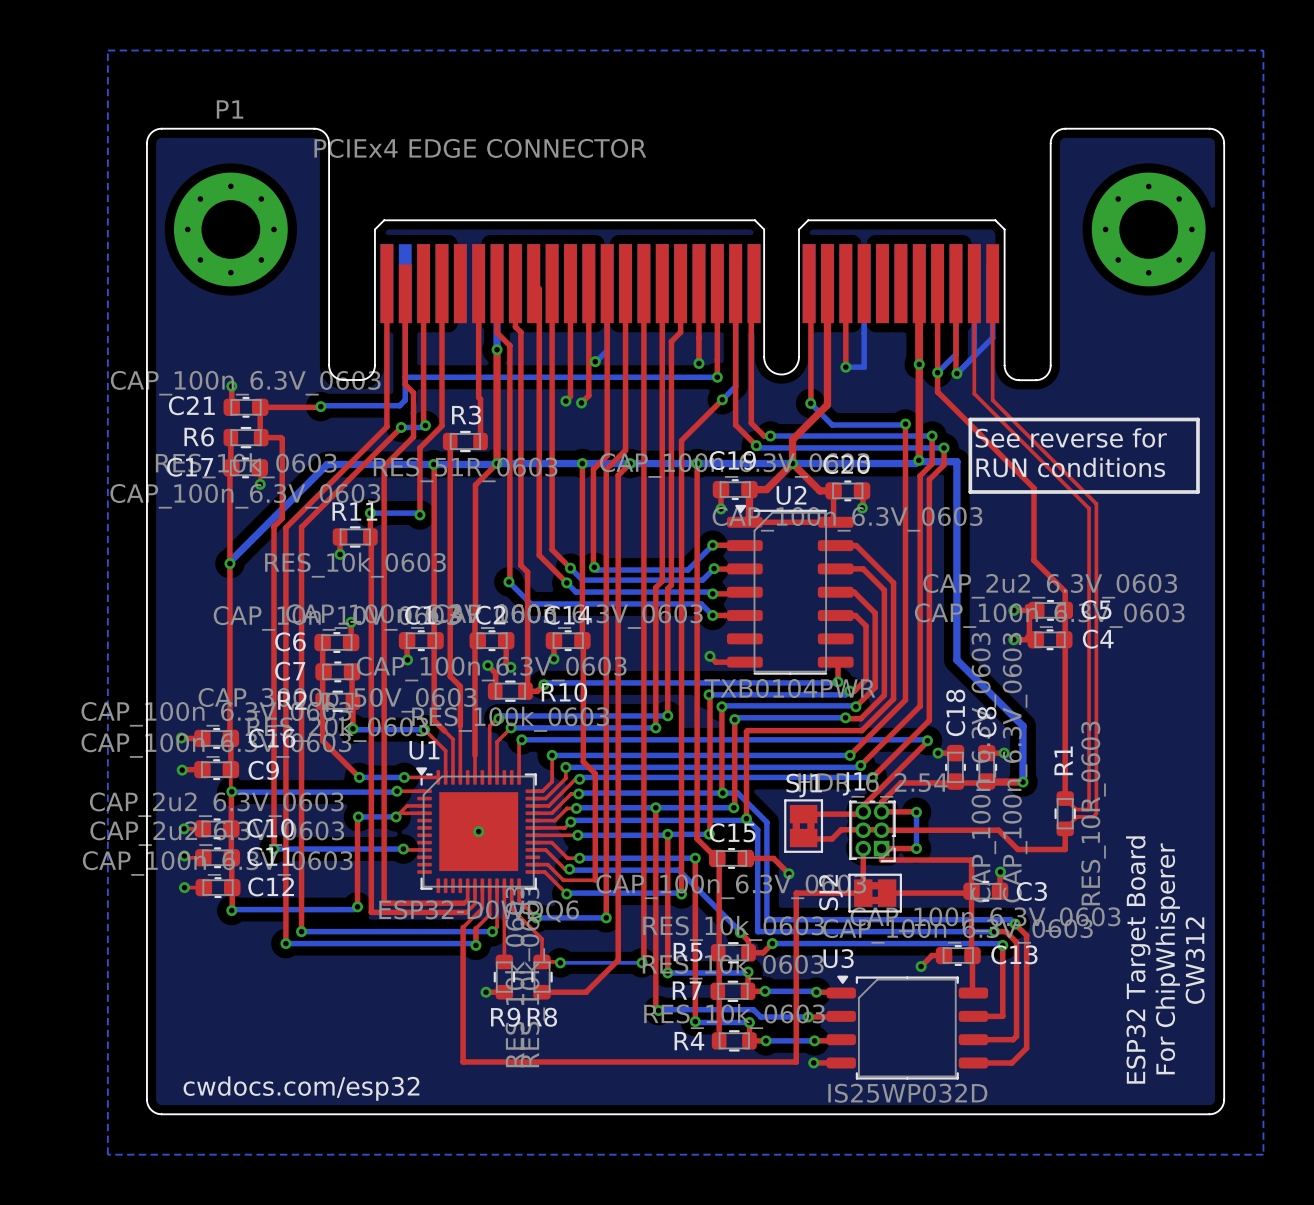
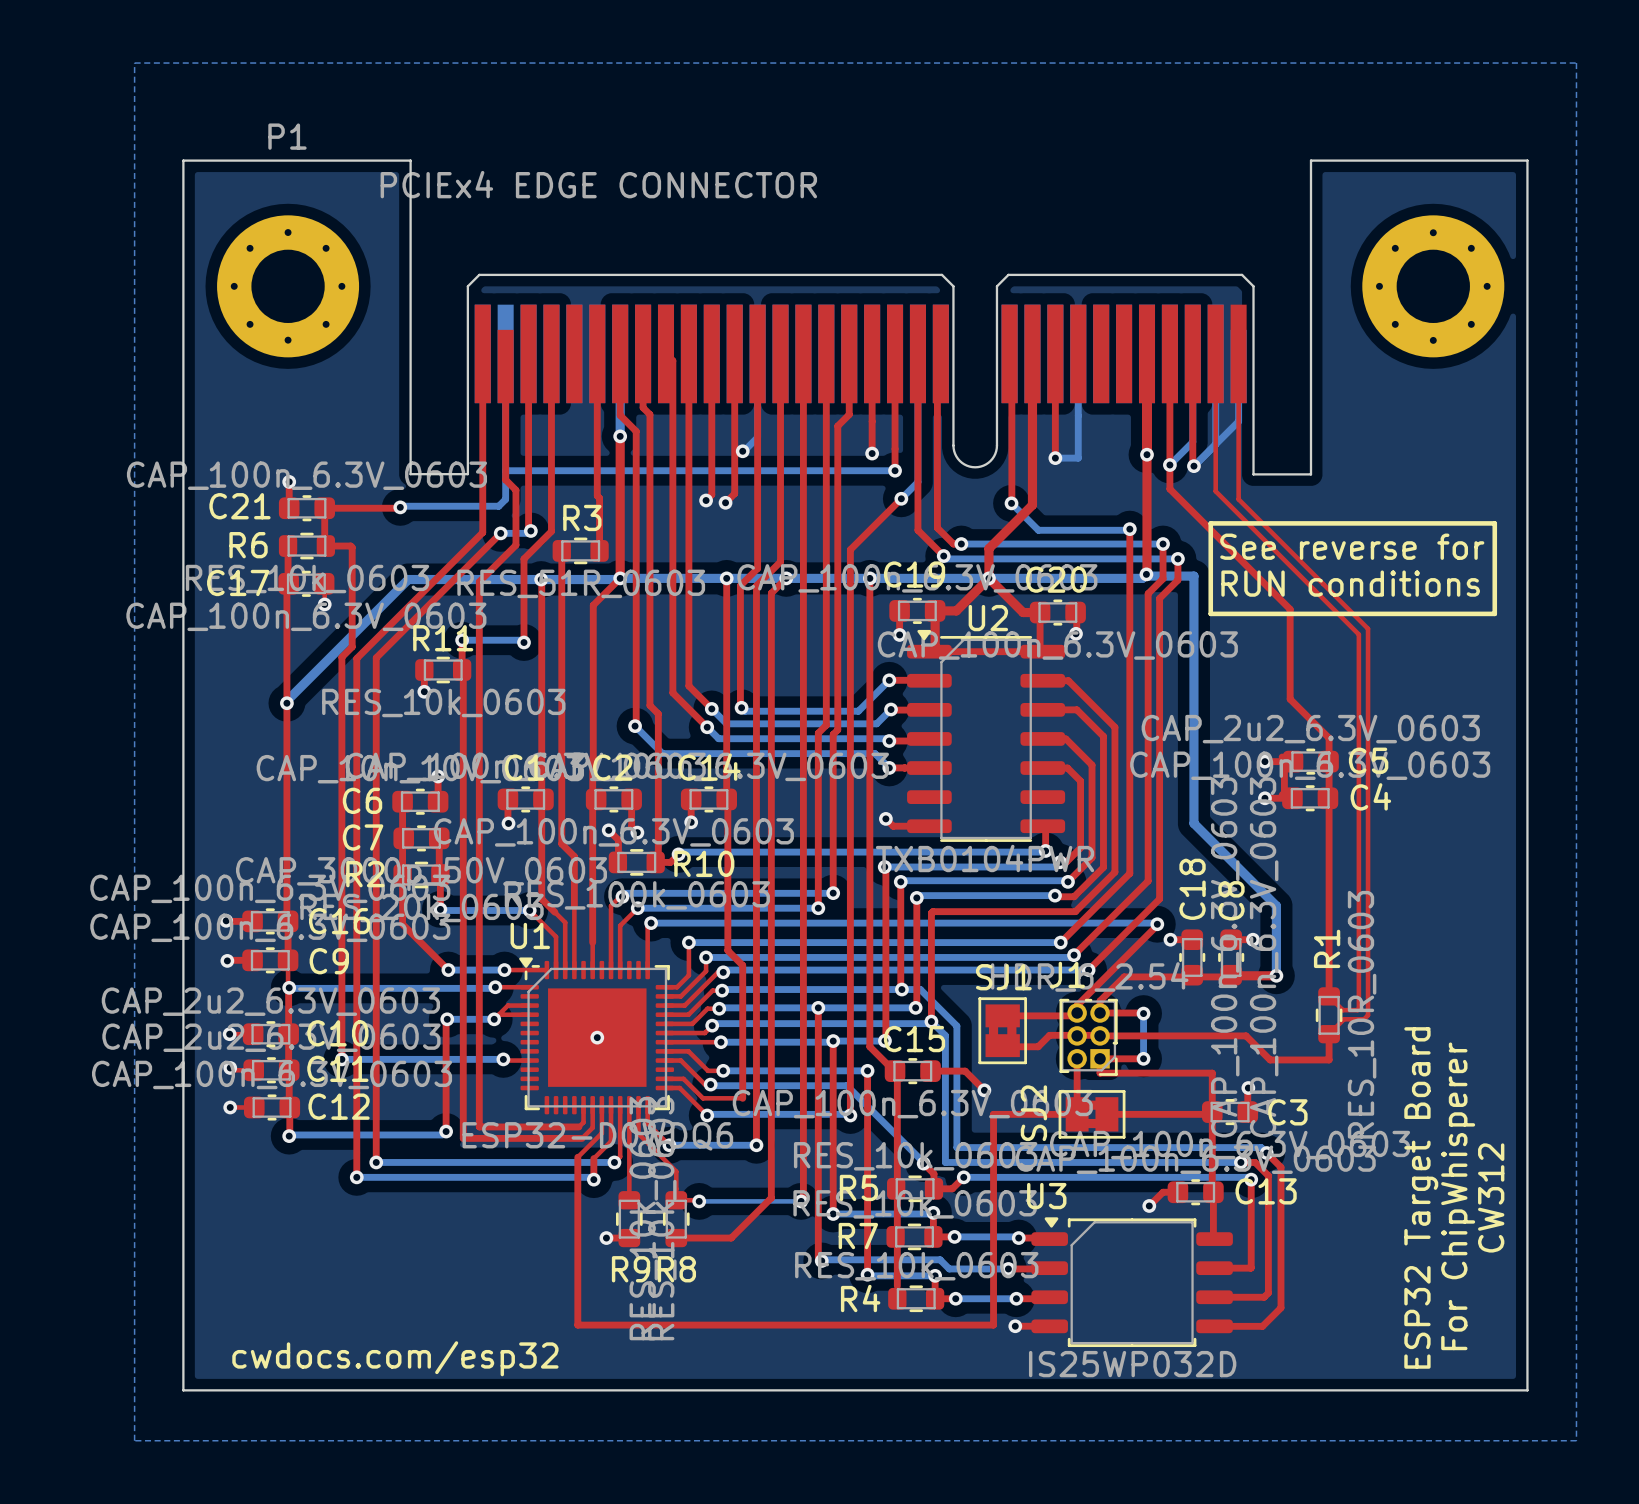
P1 footprint: [146, 127, 1226, 1116] -> [182, 159, 1529, 1392]

